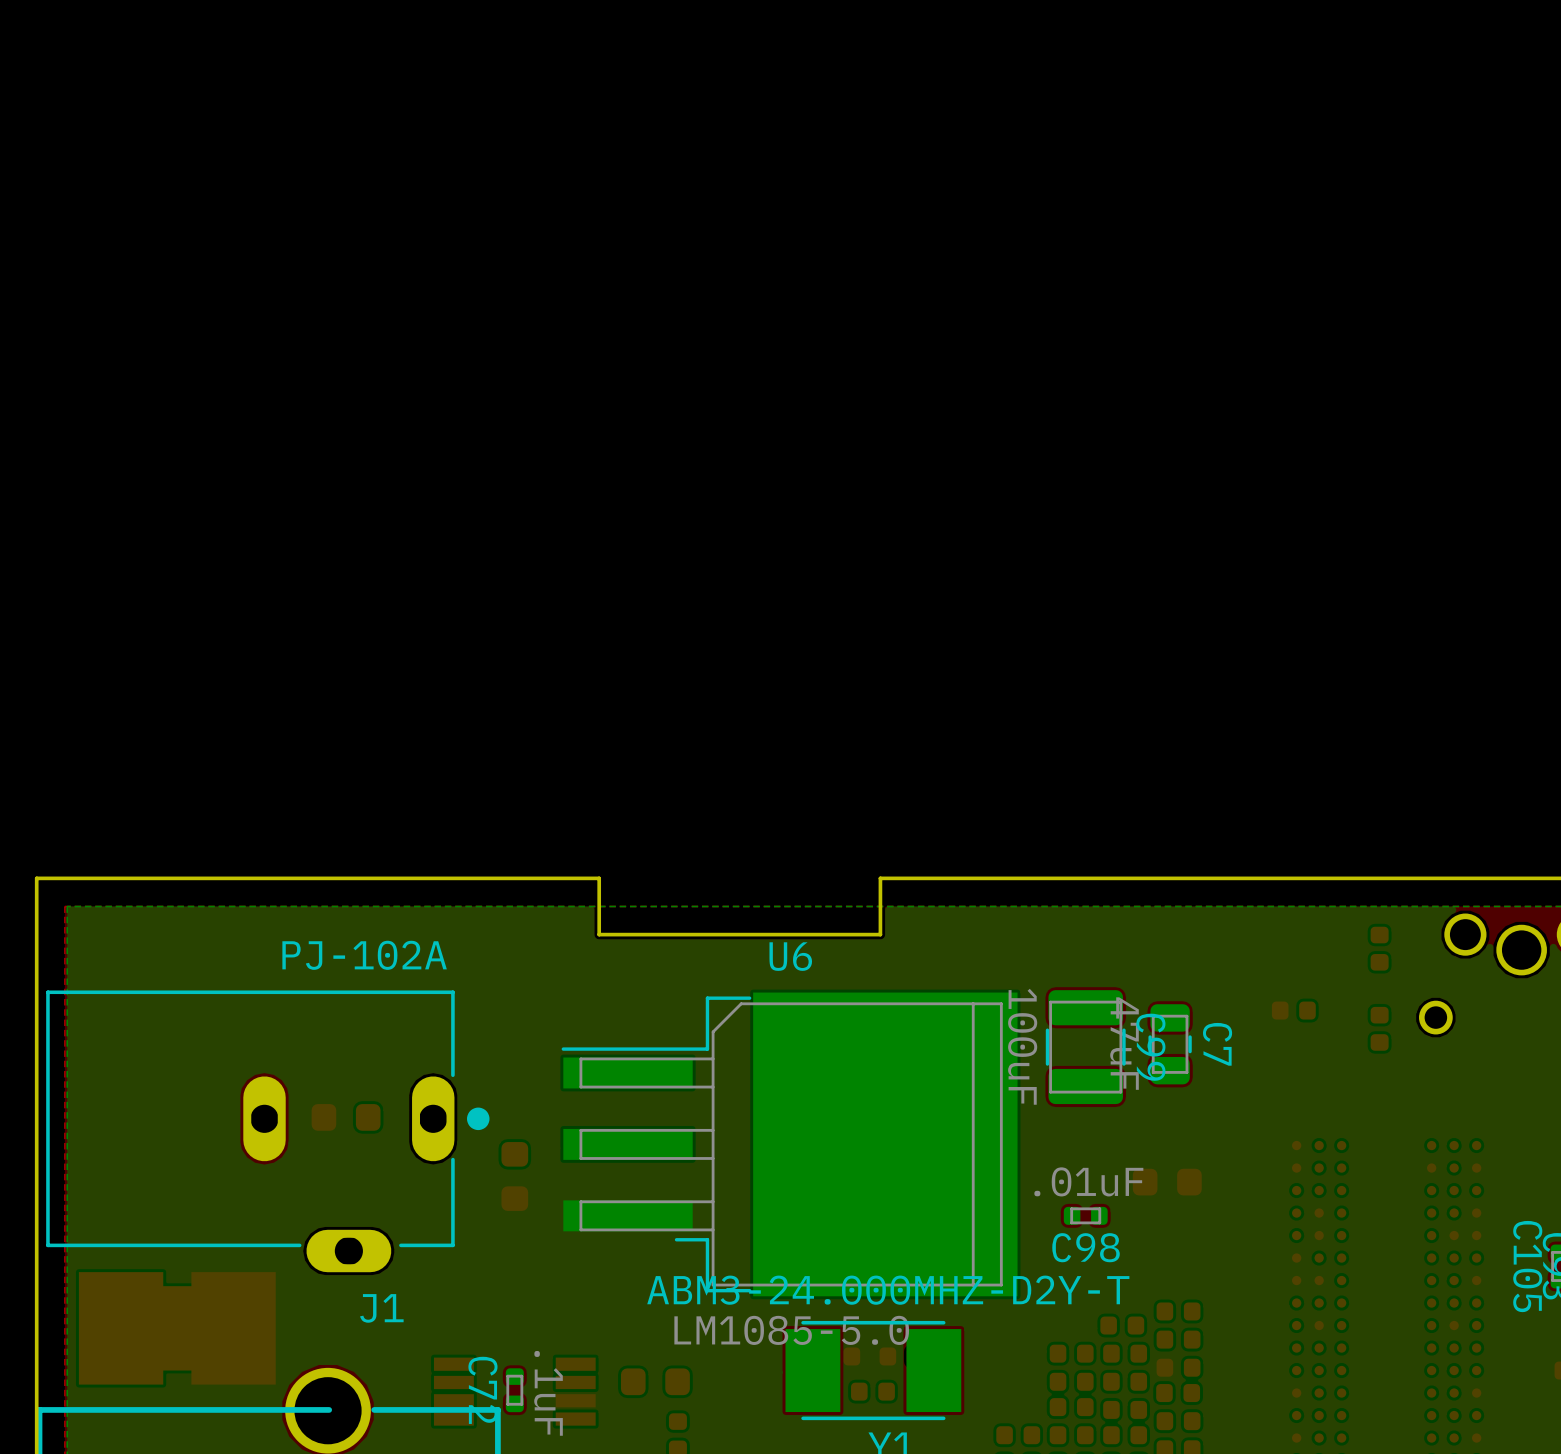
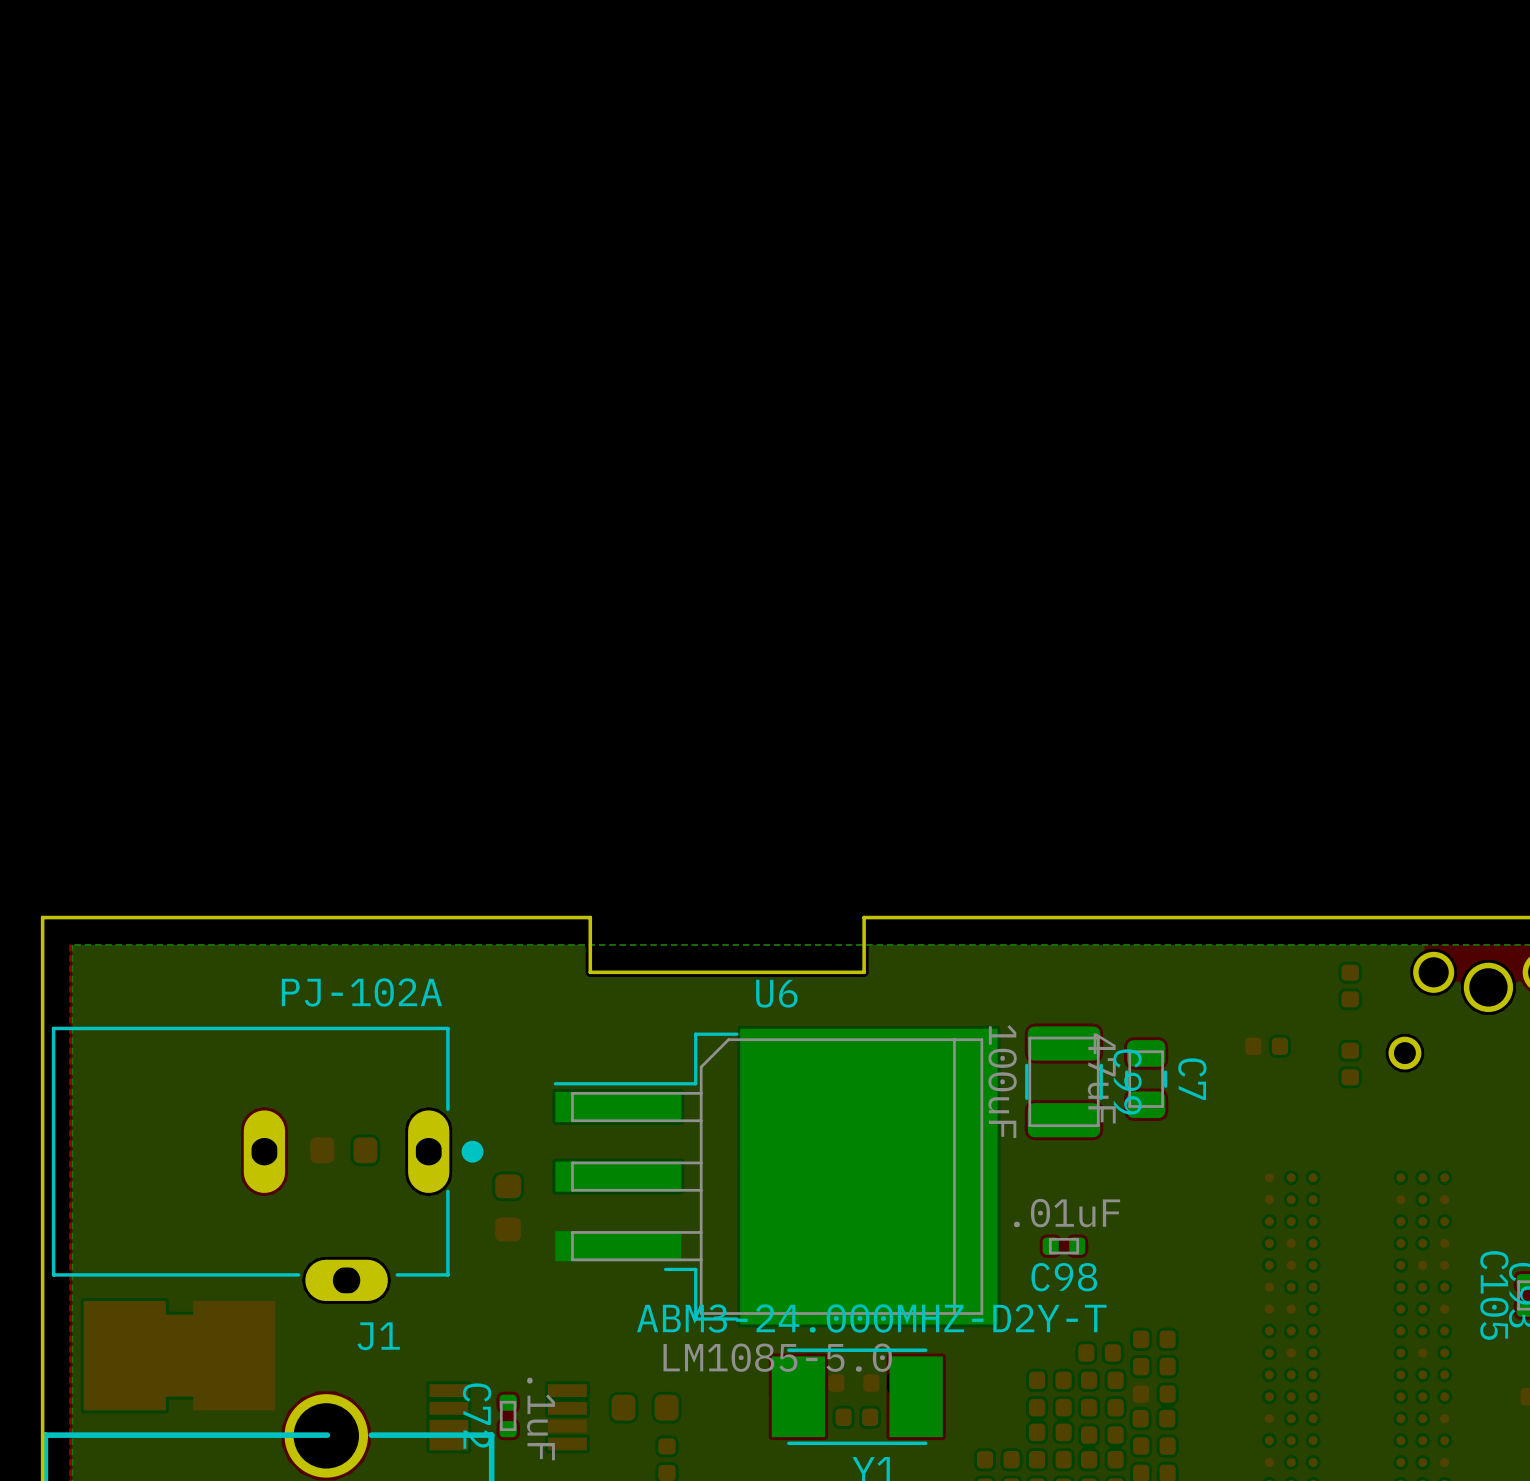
part: (1167, 1182) -> none

